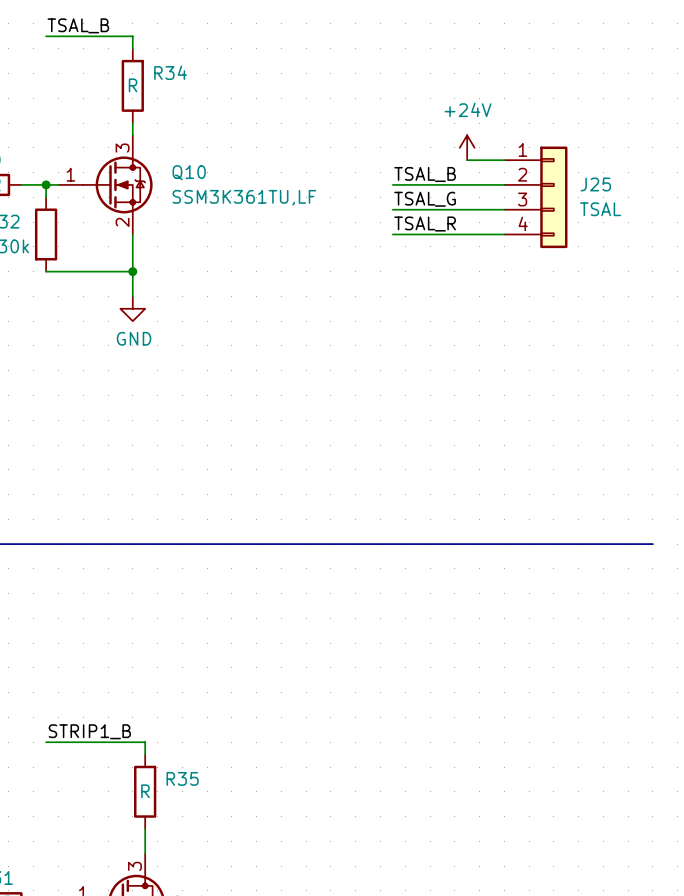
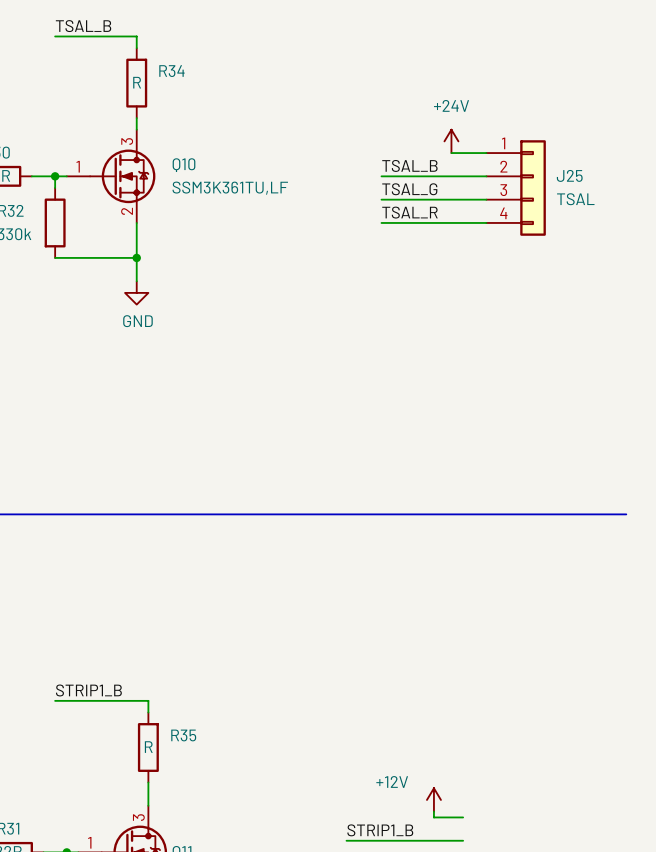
power symbol: none -> +12V (433, 799)
wire: none -> (433, 811) (433, 817) (463, 817)
label: none -> STRIP1_B (380, 830)
wire: none -> (346, 840) (463, 840)

